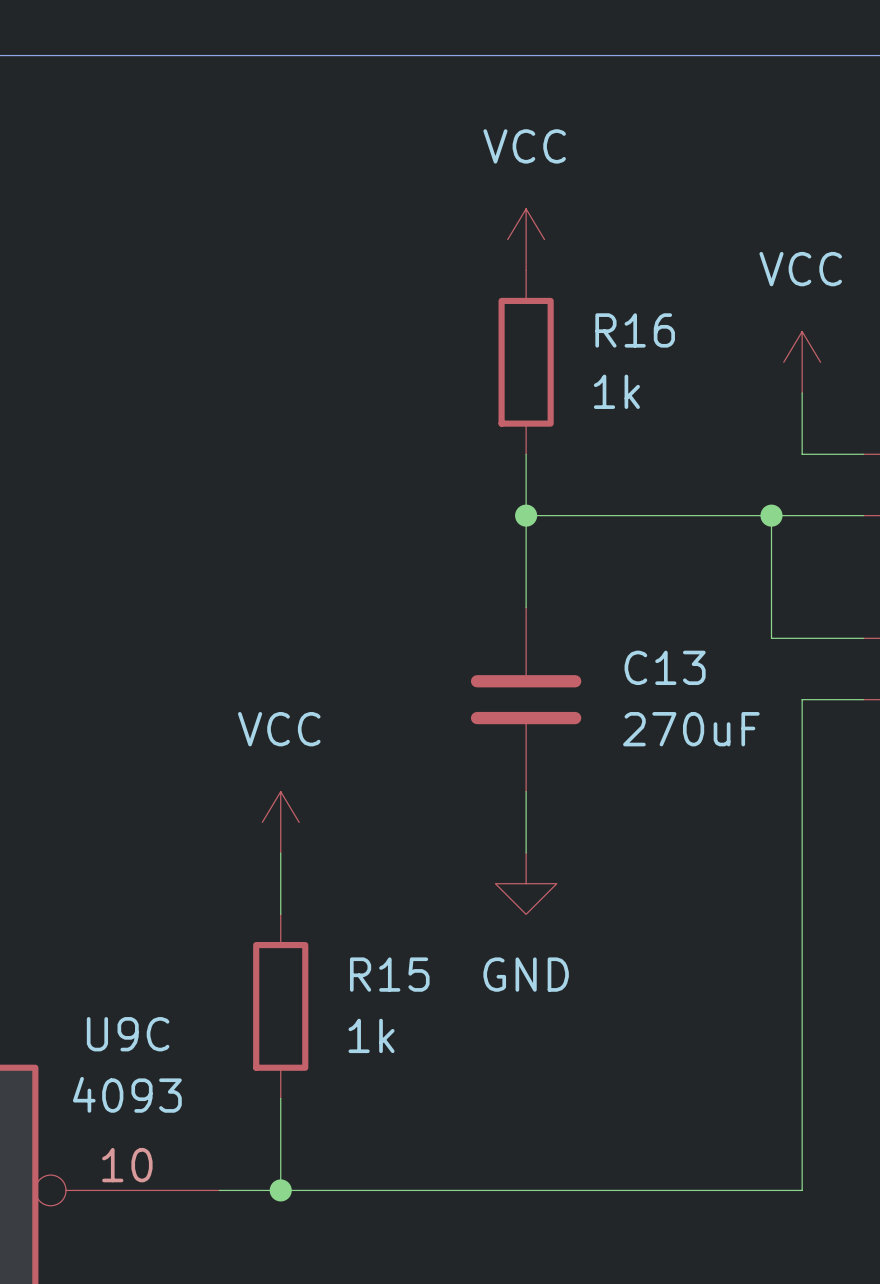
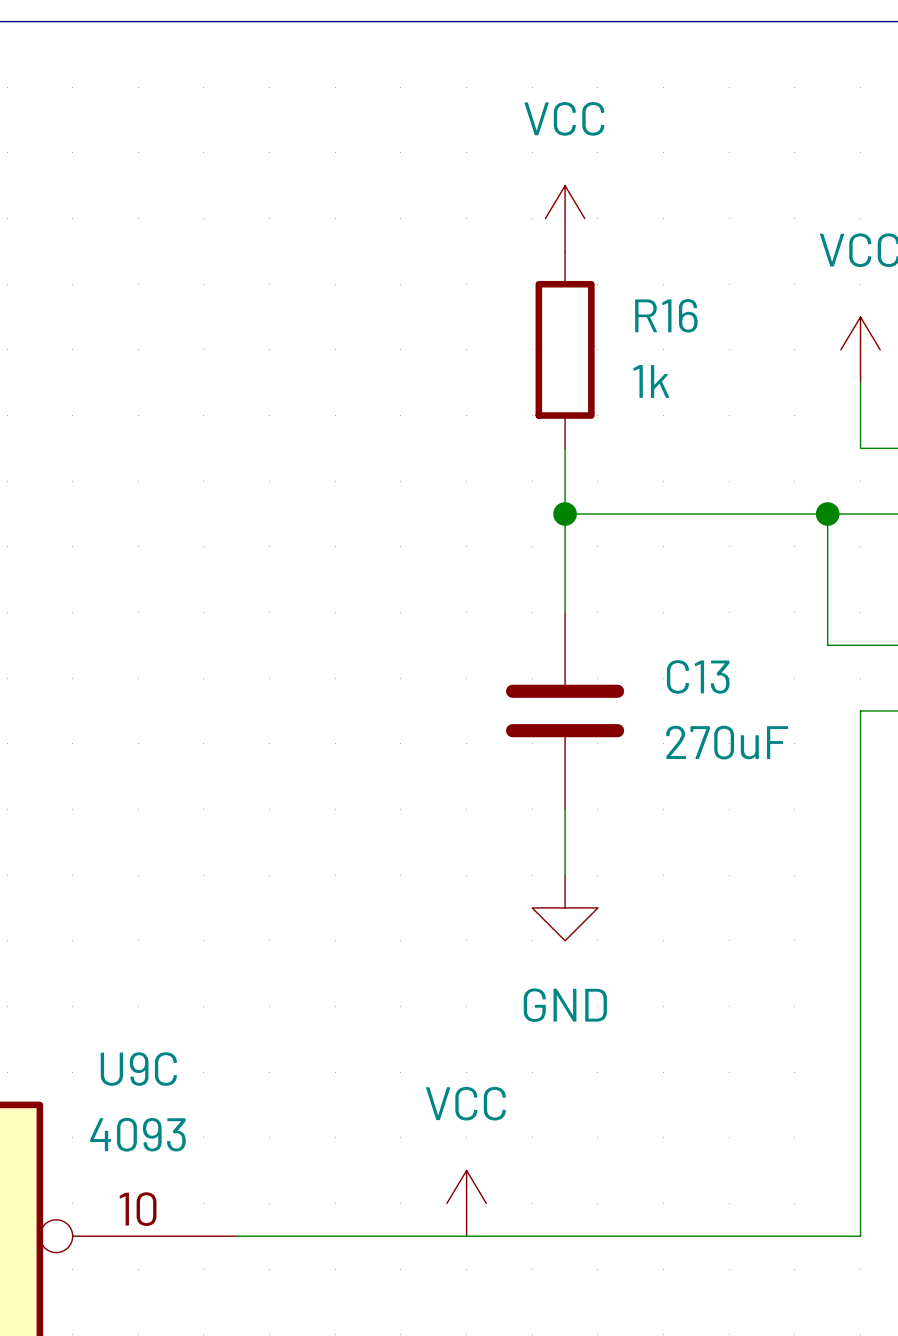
power symbol: VCC (280, 822) -> none
wire: (280, 853) (280, 914) -> none
R15: 1k (280, 1006) -> none
wire: (280, 1098) (280, 1190) -> none
power symbol: none -> VCC (466, 1203)
junction: (280, 1190) -> none

